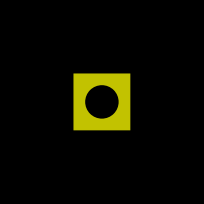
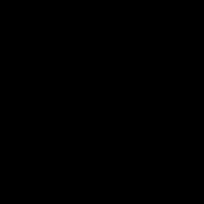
part: (101, 101) -> none

